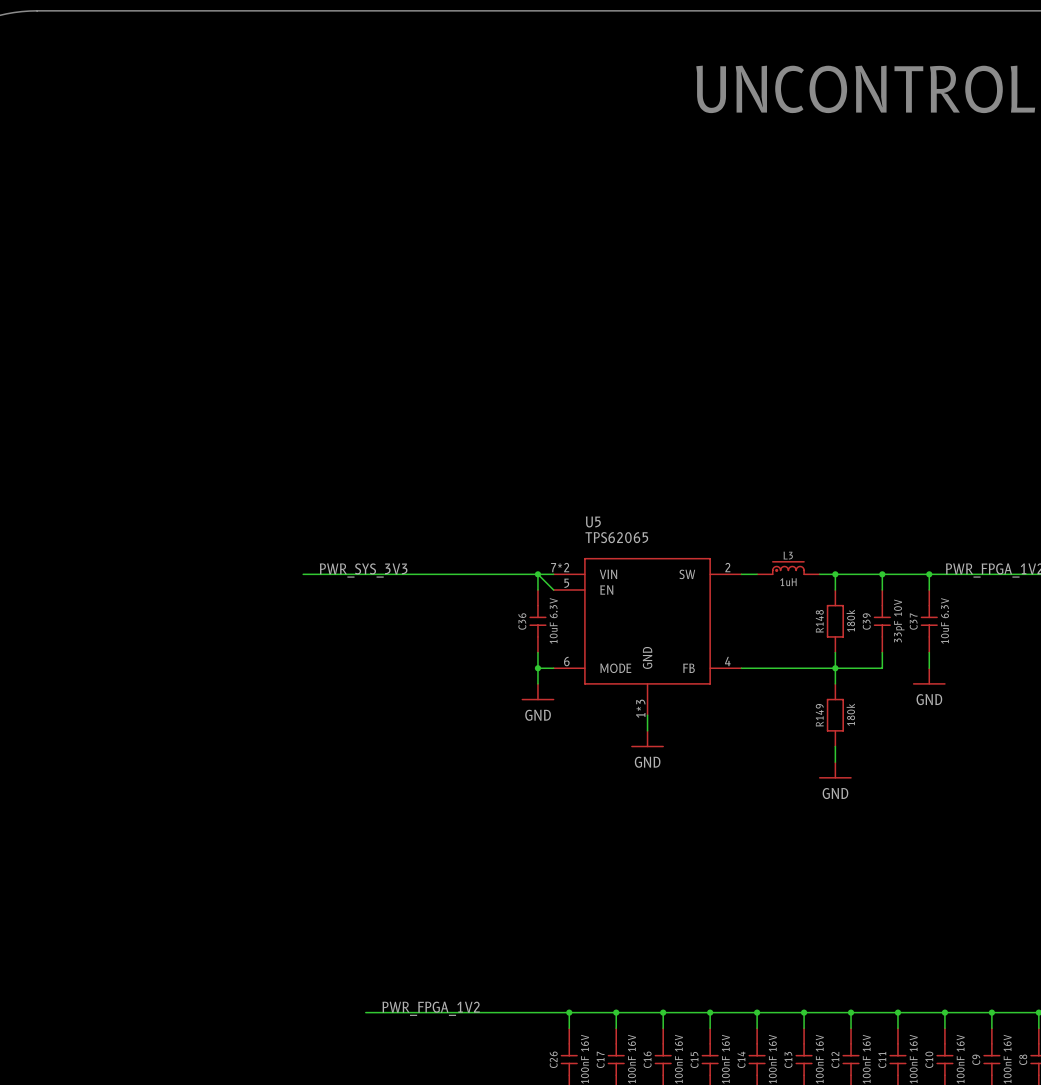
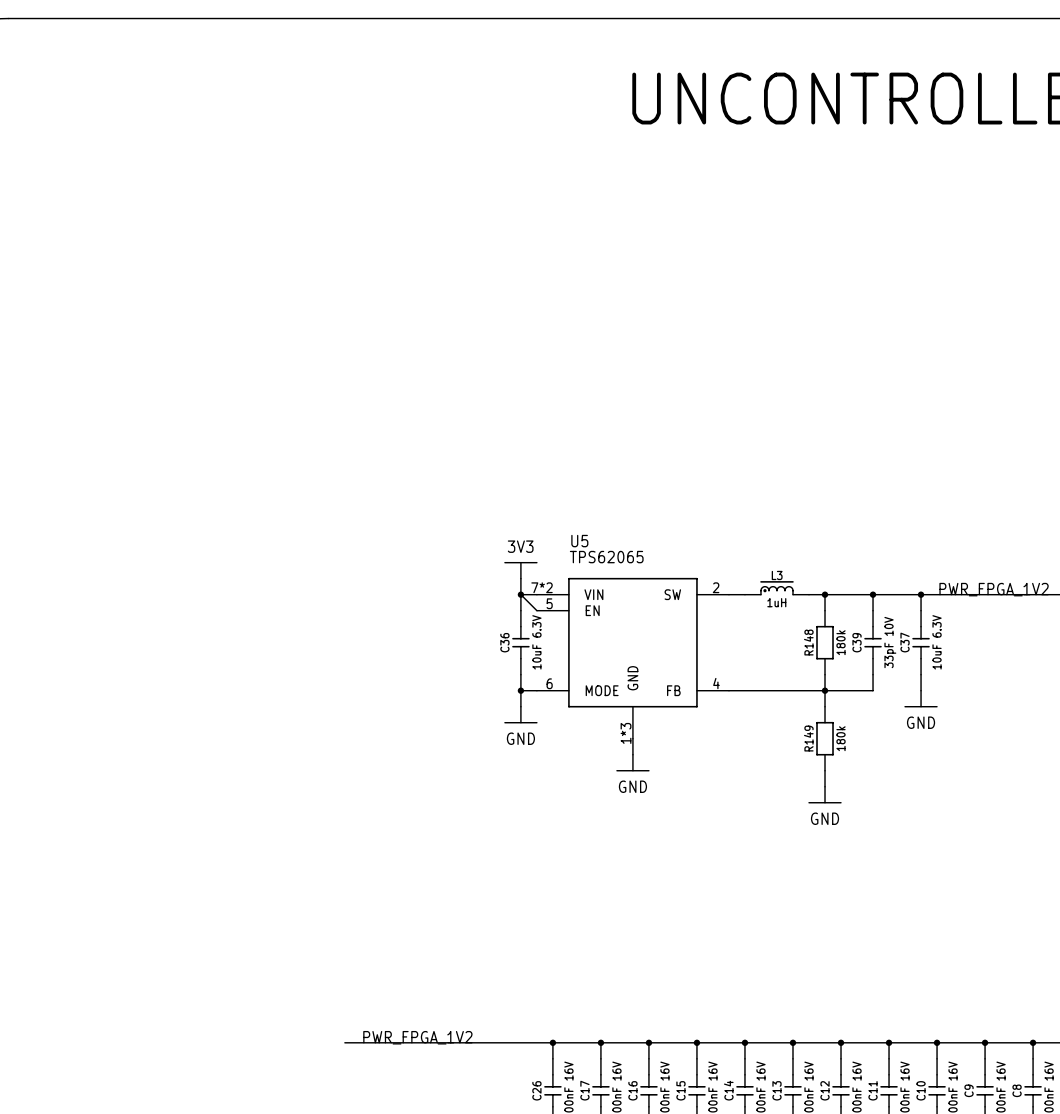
power symbol: none -> 3V3 (520, 570)
label: PWR_SYS_3V3 (363, 570) -> none
wire: (303, 574) (537, 574) -> (520, 578) (520, 594)

